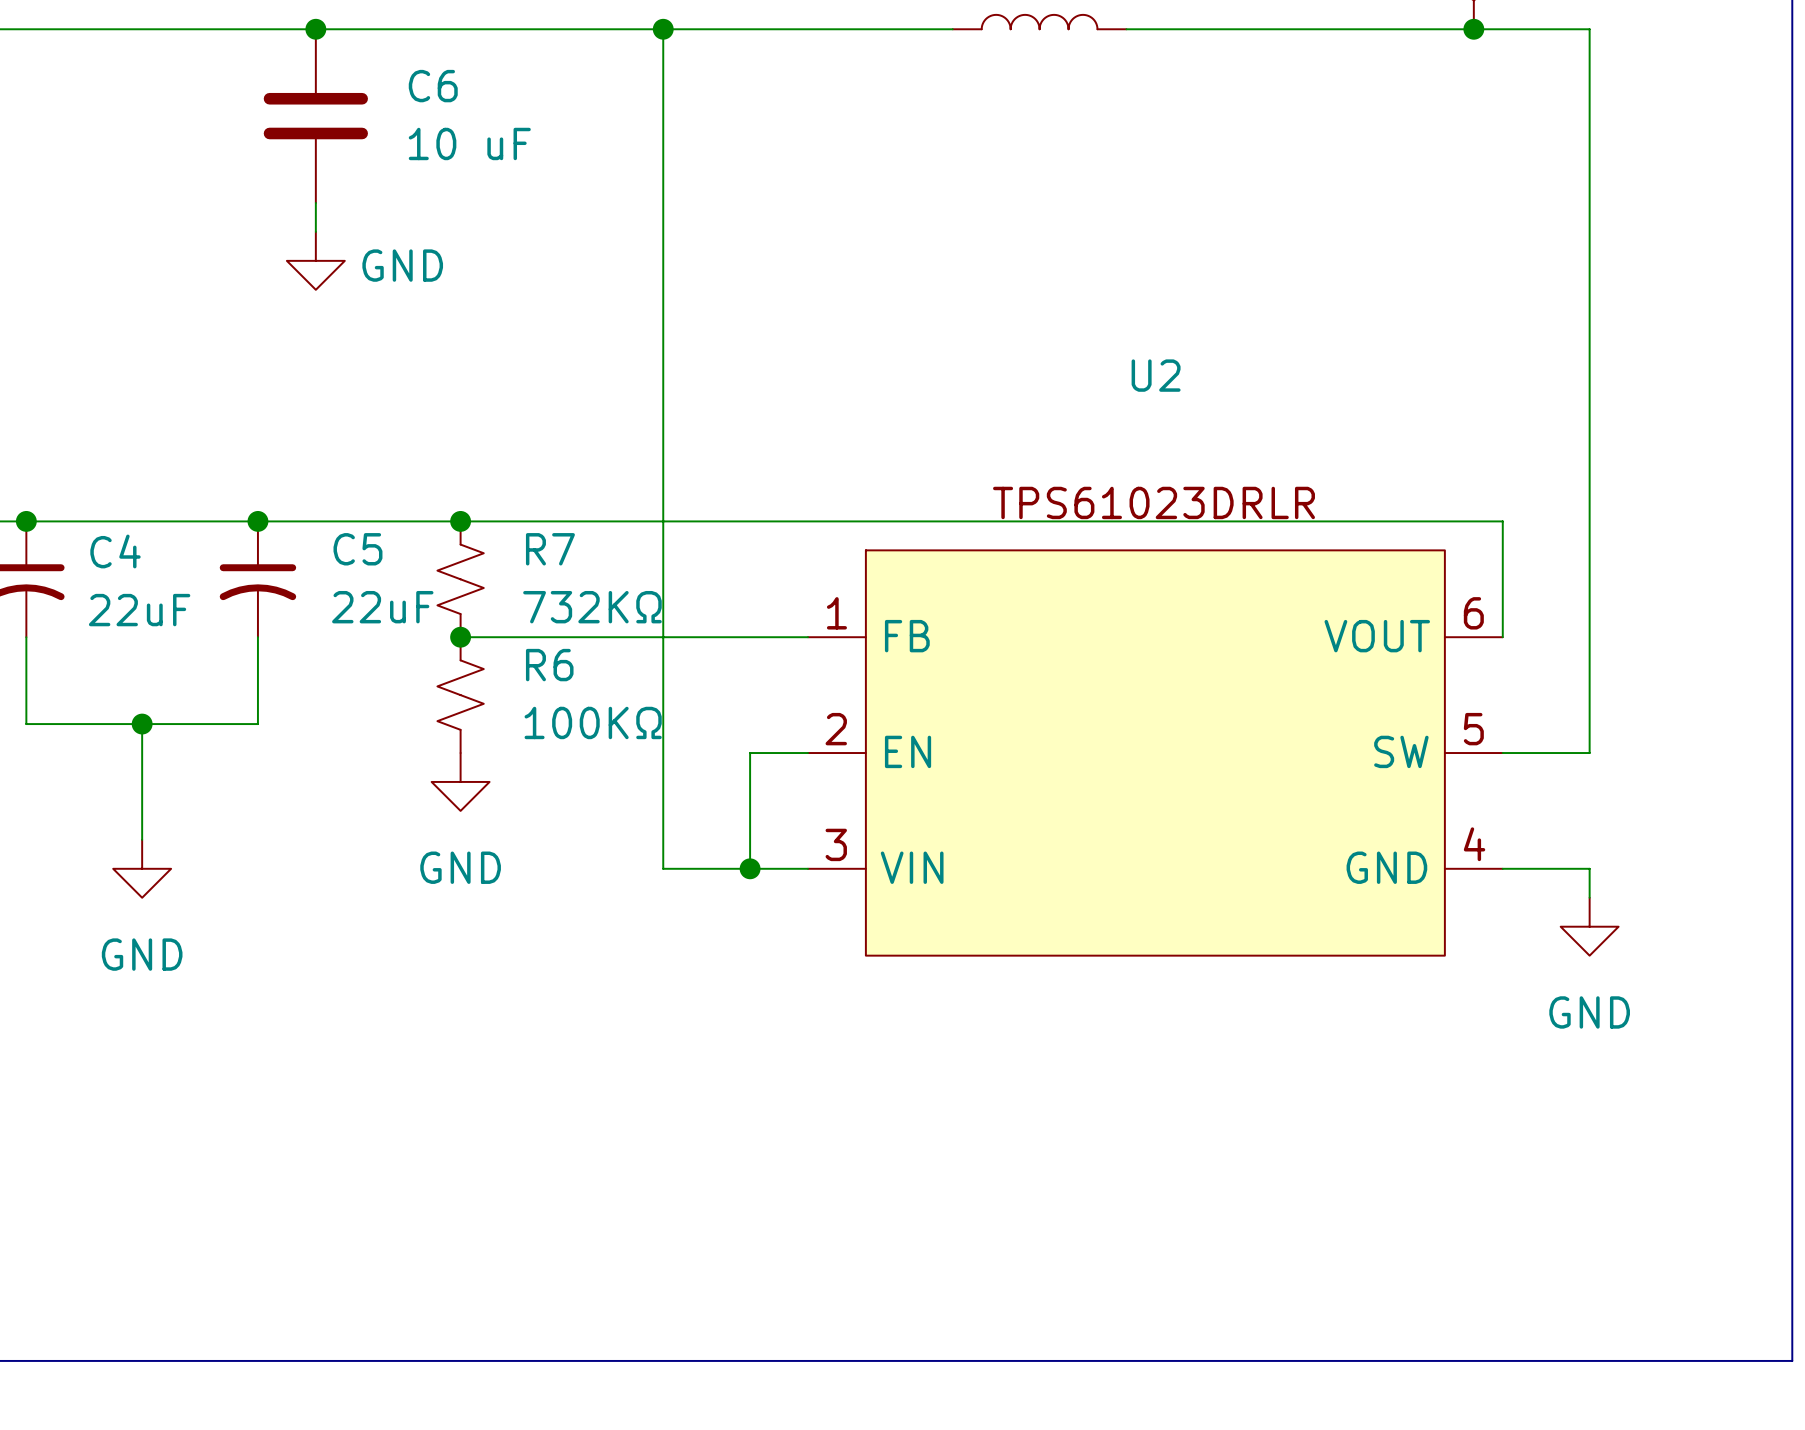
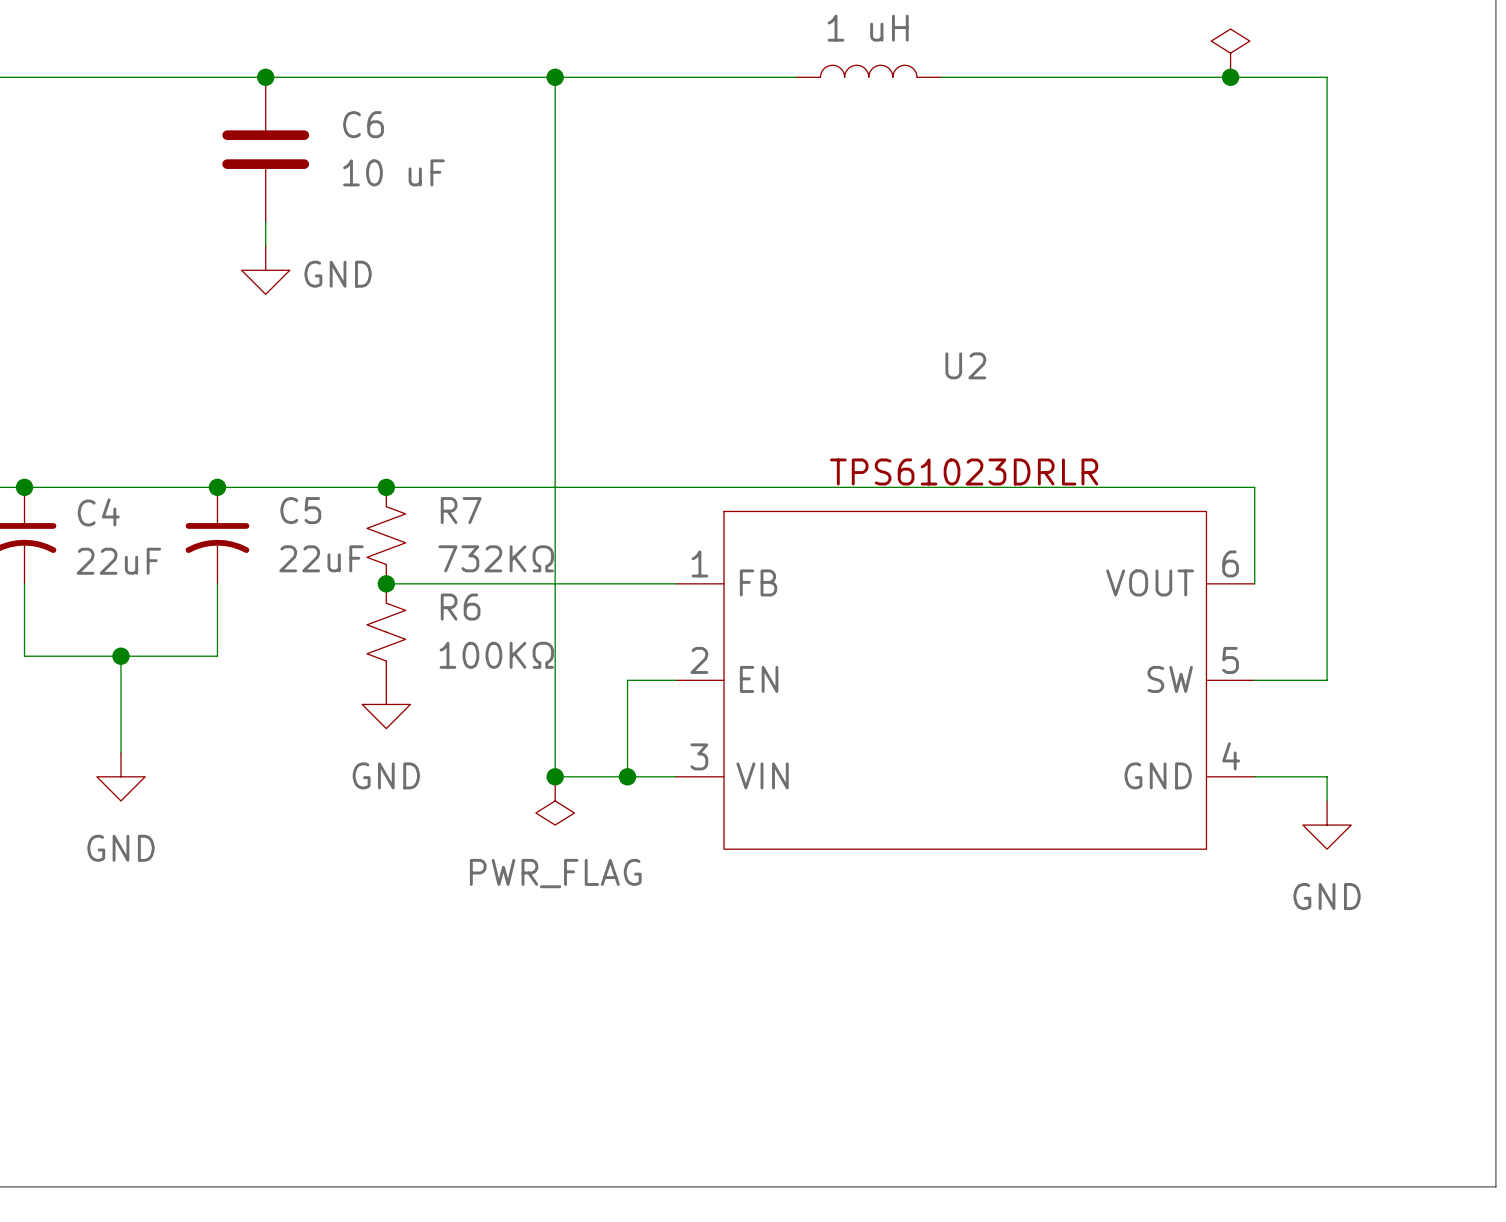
junction: none -> (555, 776)
power symbol: none -> PWR_FLAG (555, 800)

